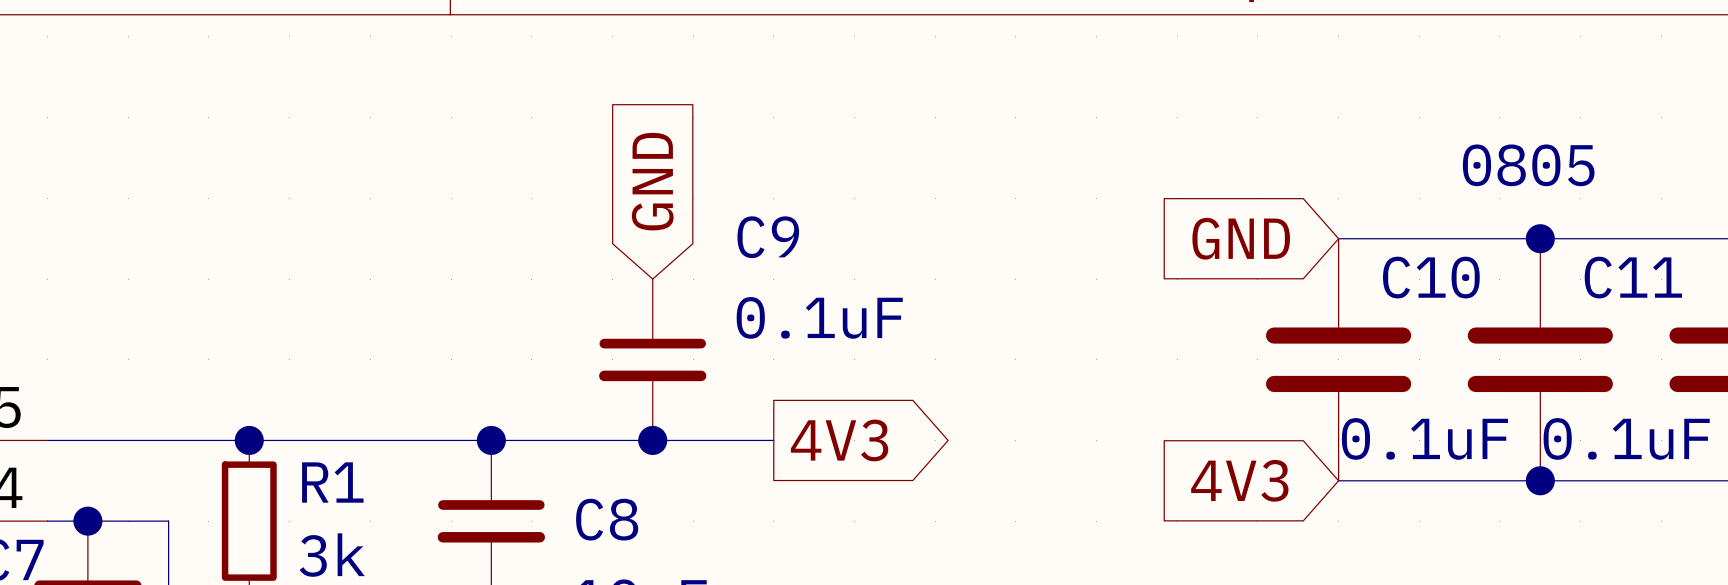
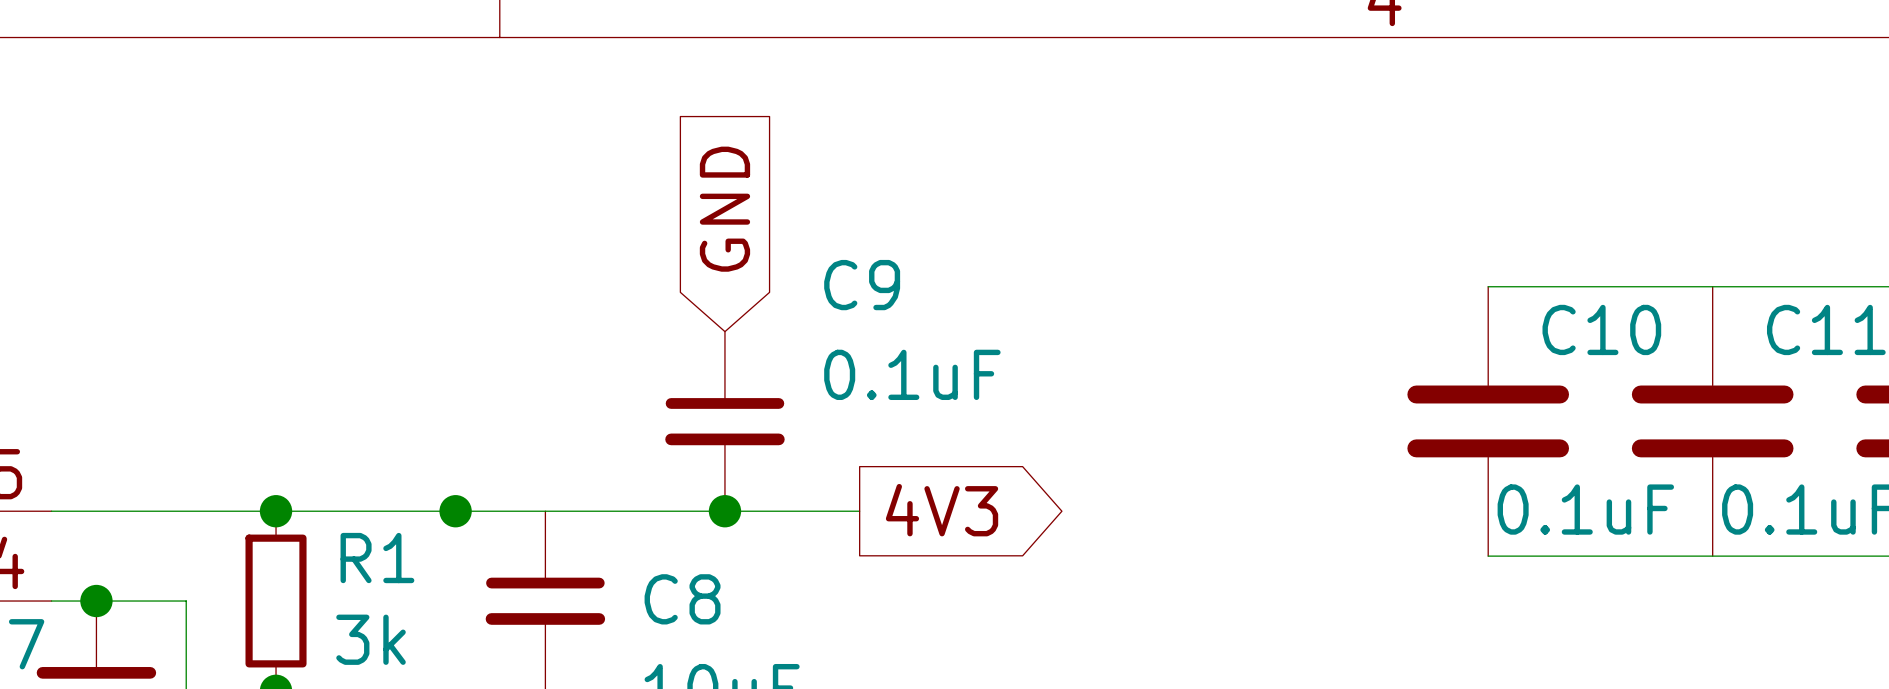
text: 0805 (1528, 165) -> none
global label: GND (1241, 238) -> none
junction: (1540, 238) -> none
junction position: (491, 440) -> (455, 511)
global label: 4V3 (1239, 480) -> none
junction: (1540, 480) -> none

